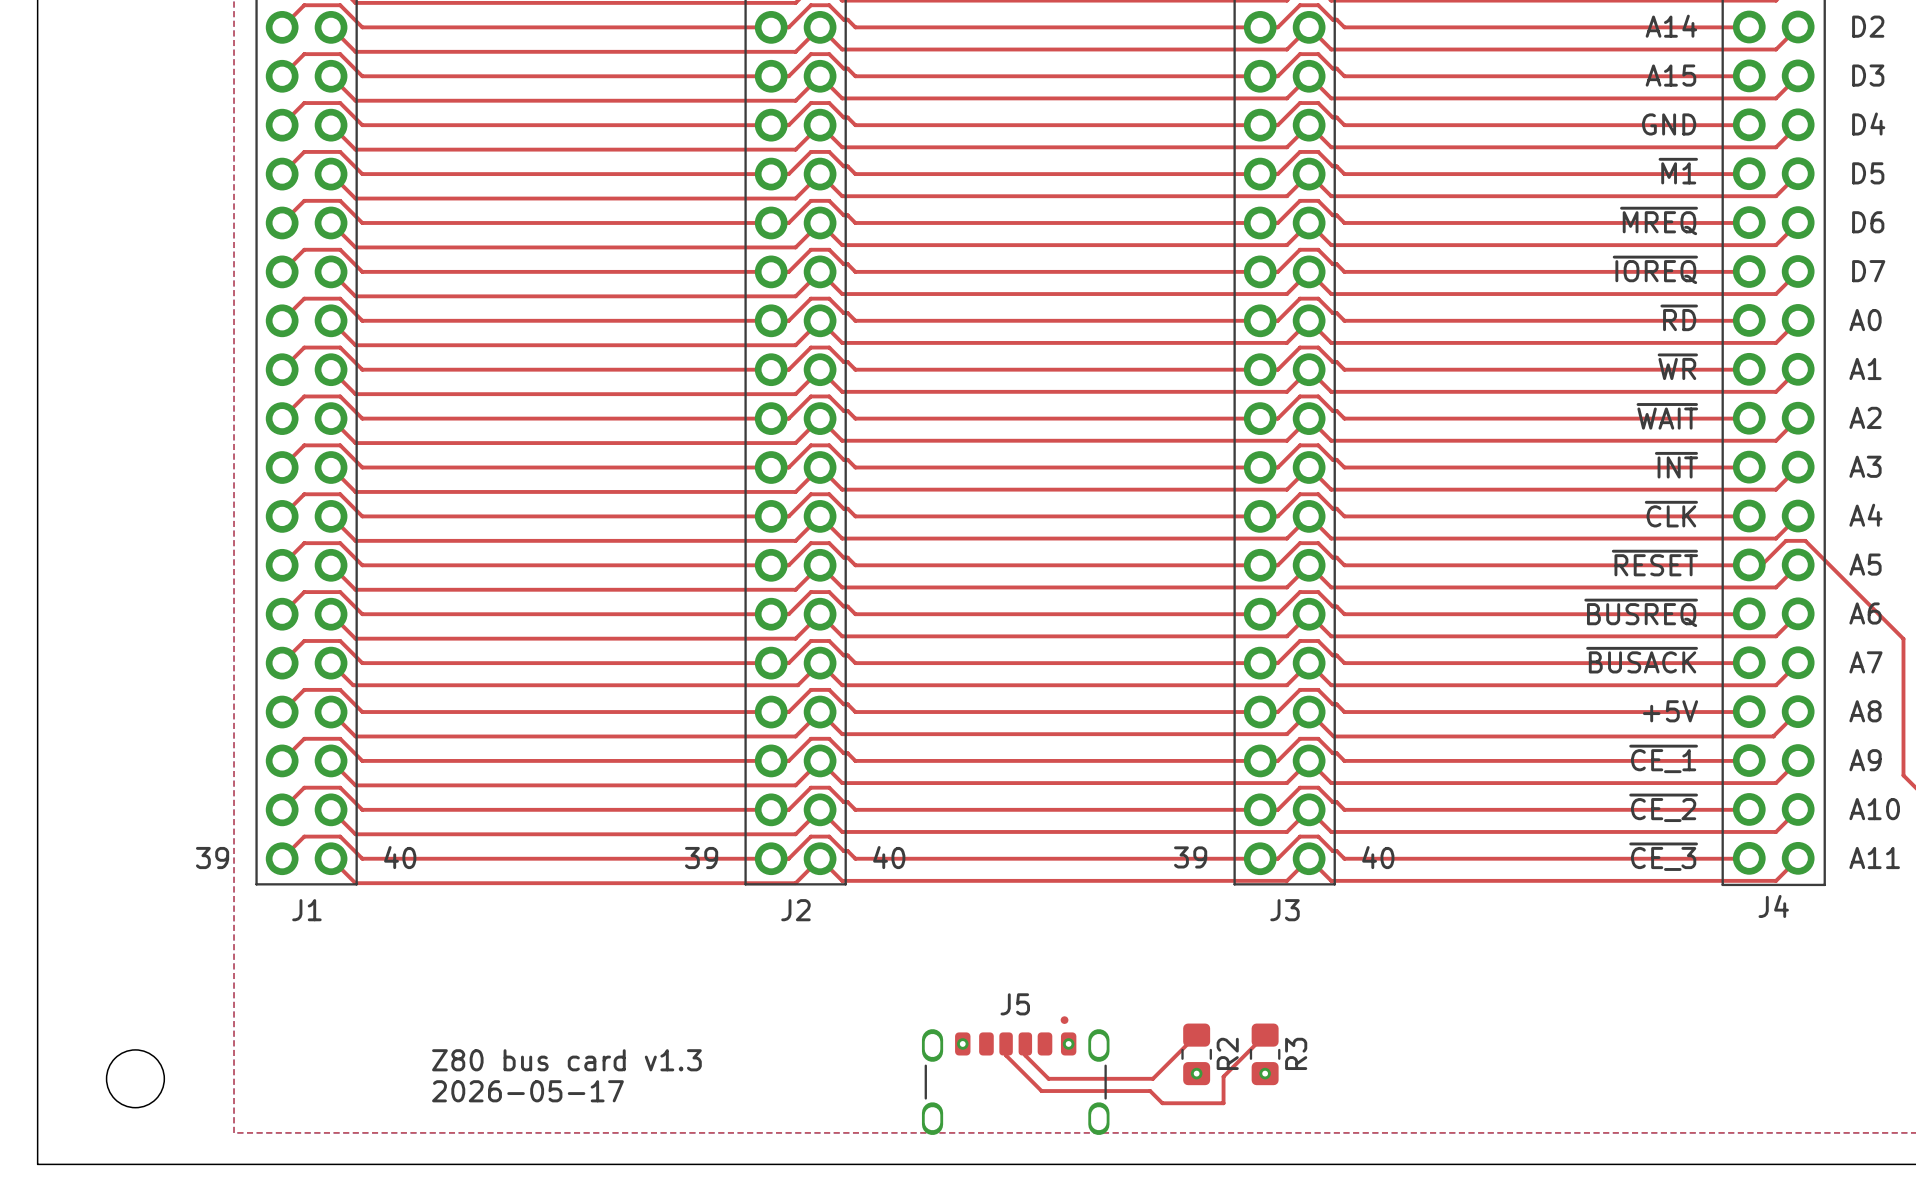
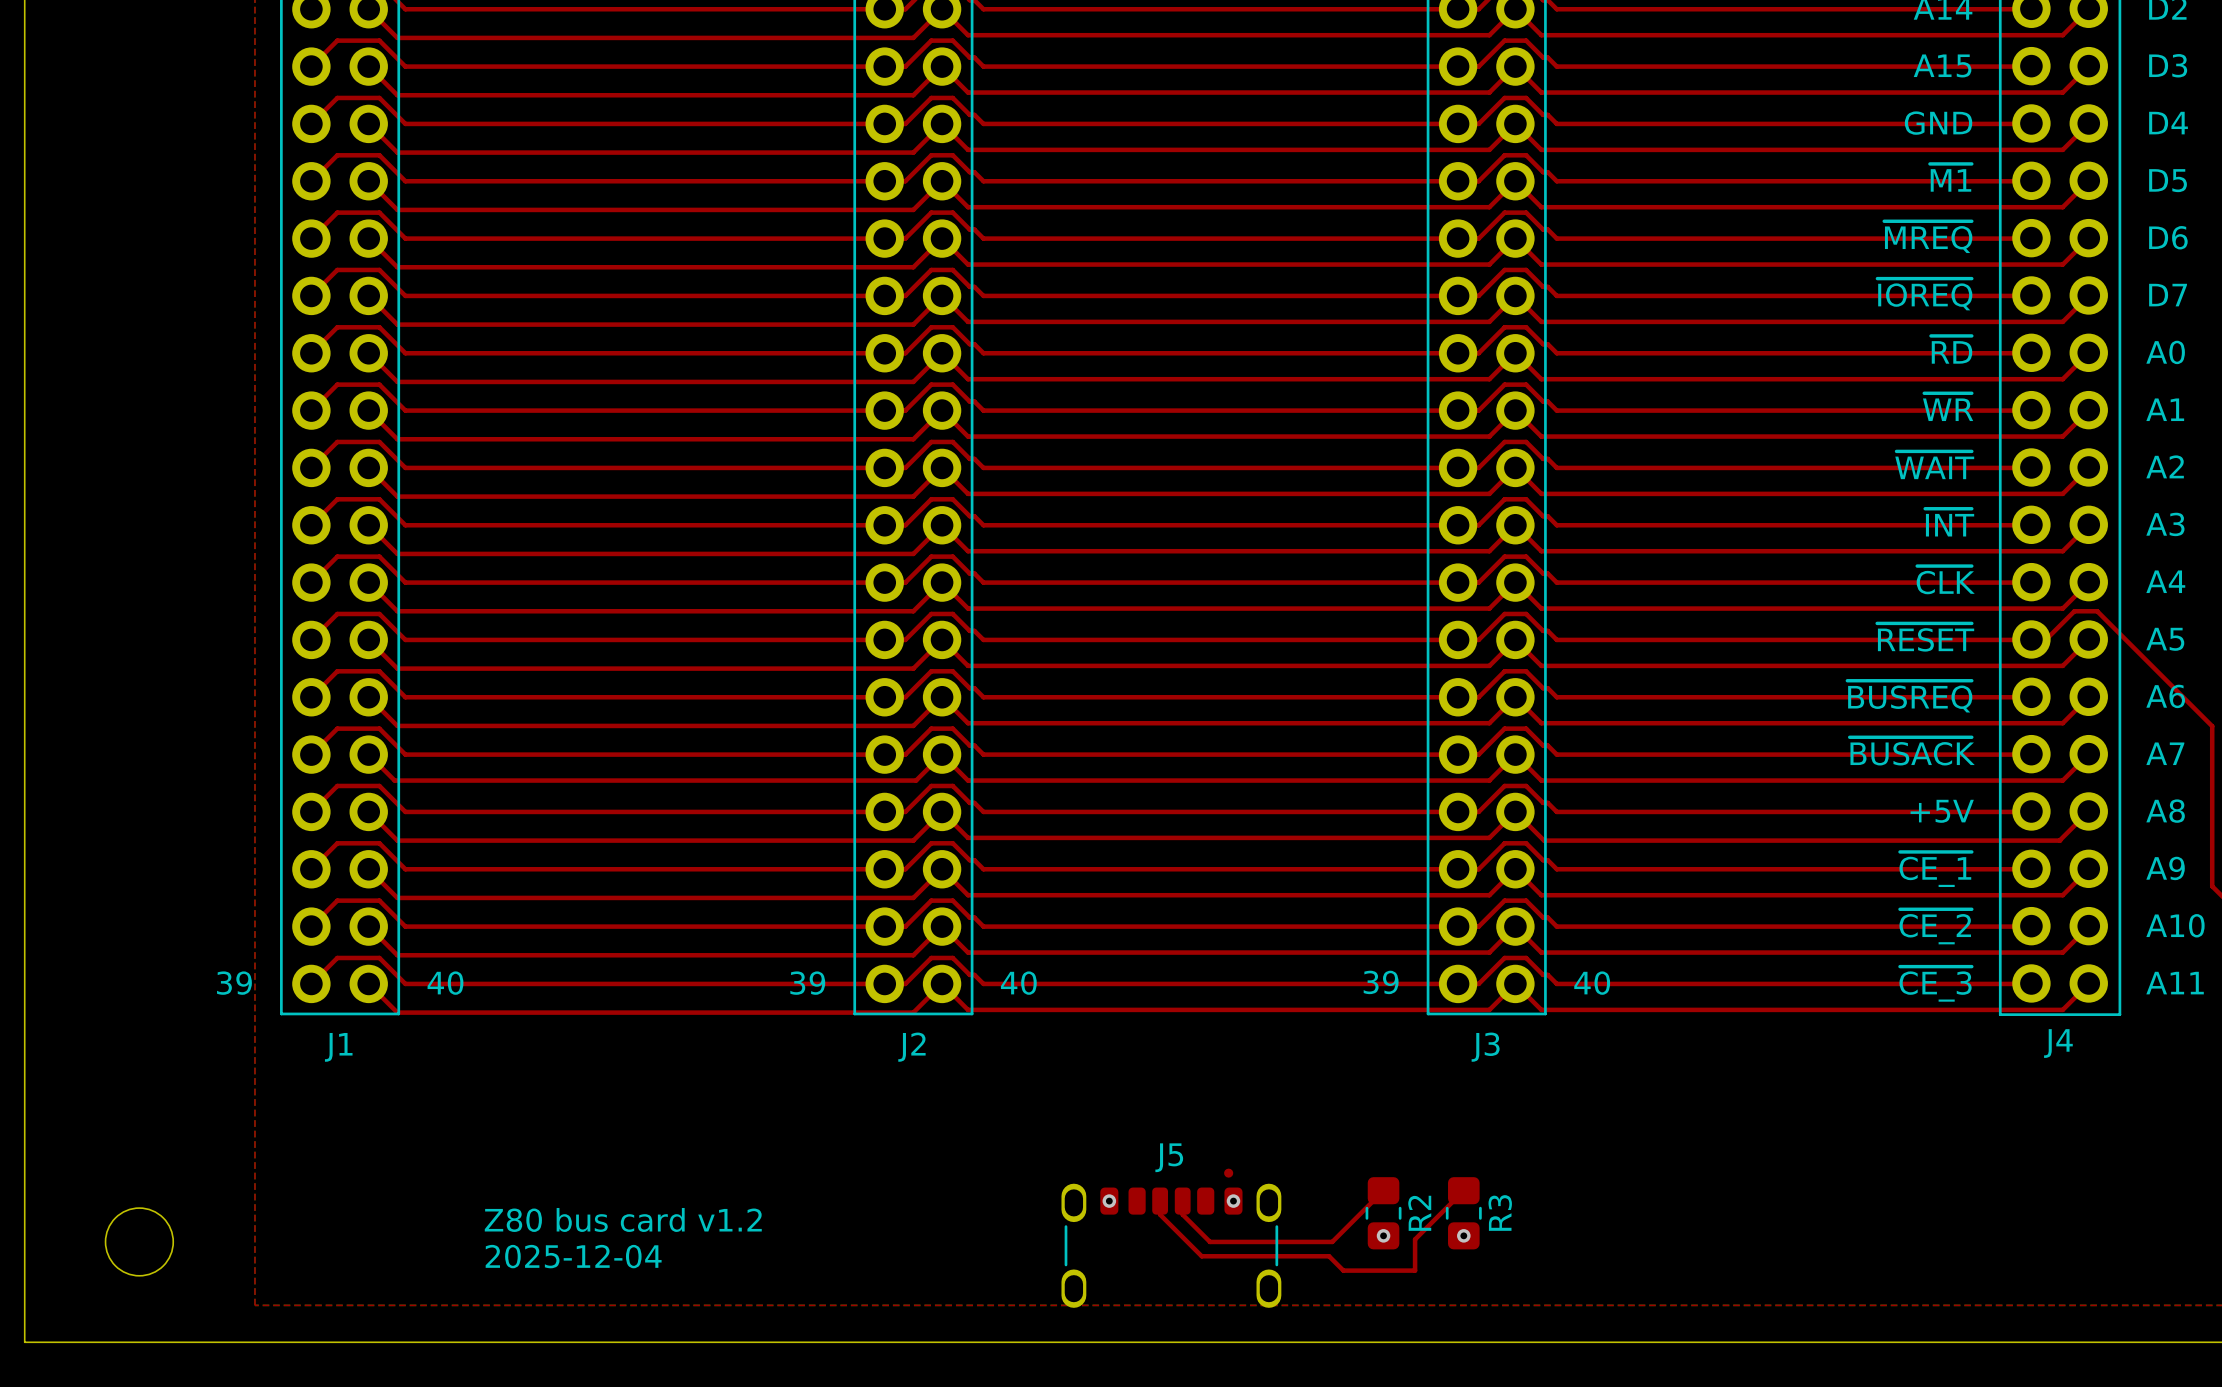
text: Z80 bus card v1.3 (566, 1060) -> Z80 bus card v1.2 (623, 1219)
text: 2026-05-17 (527, 1091) -> 2025-12-04 (573, 1256)

